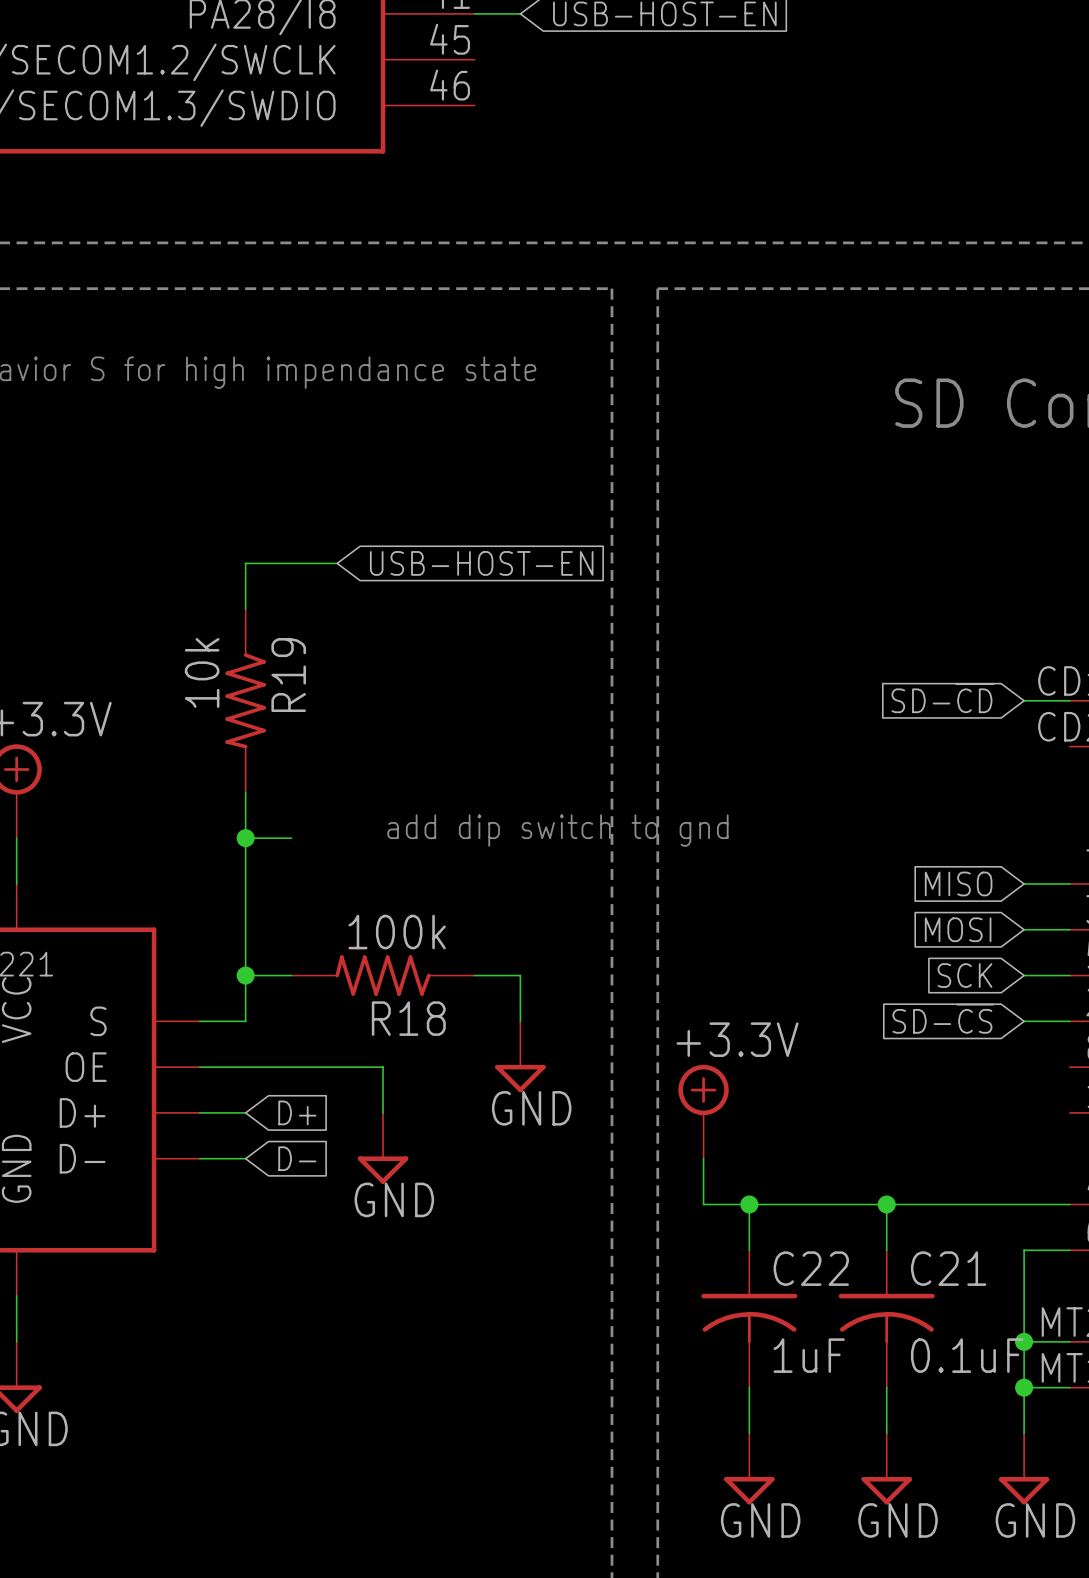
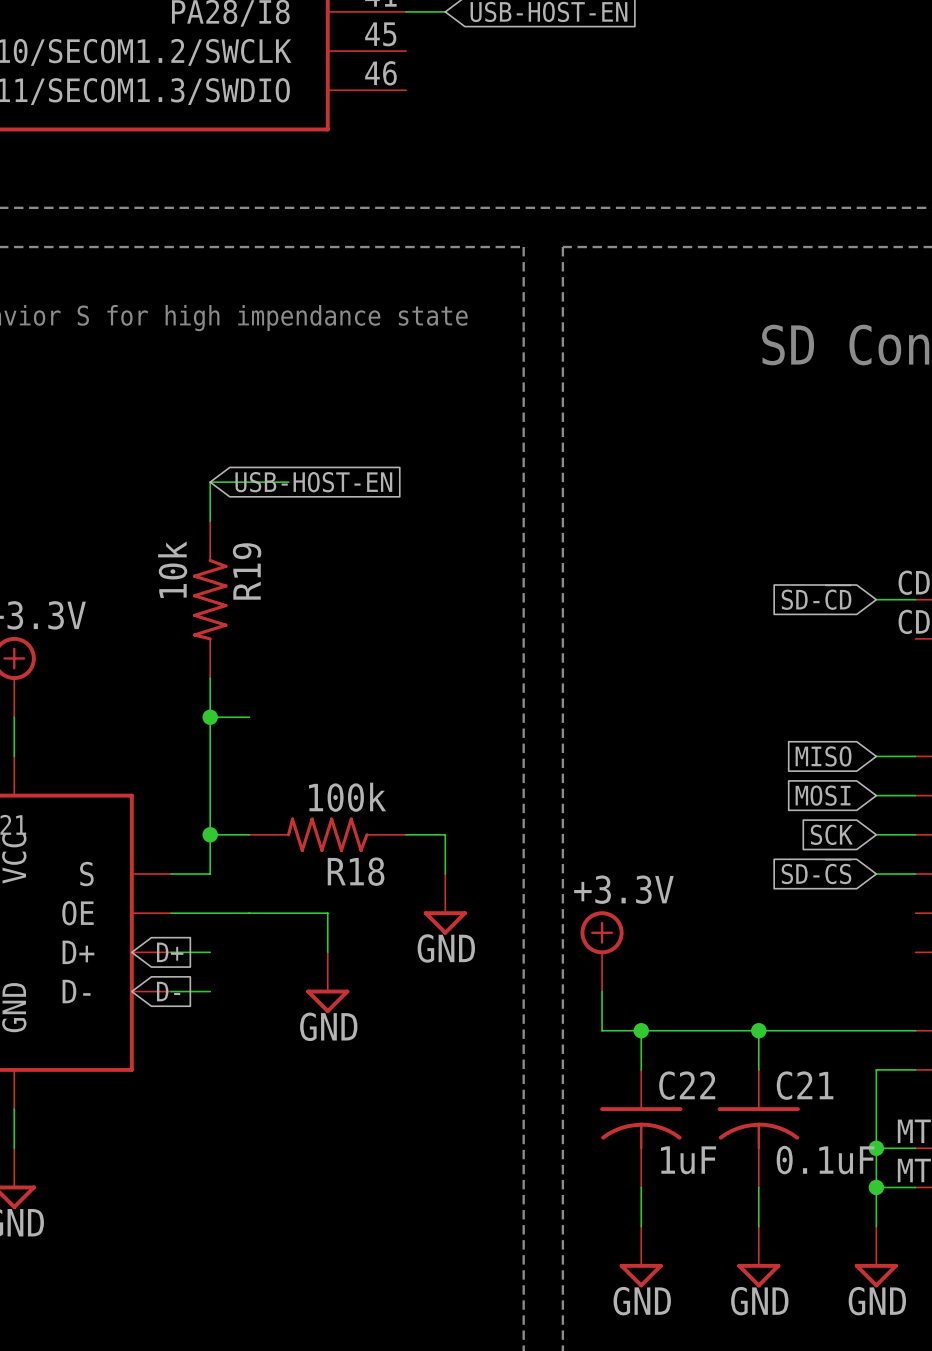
global label position: USB-HOST-EN (481, 563) -> USB-HOST-EN (313, 482)
text: add dip switch to gnd (557, 830) -> none
global label position: D+ (297, 1112) -> D+ (170, 952)
global label position: D- (297, 1158) -> D- (168, 991)

